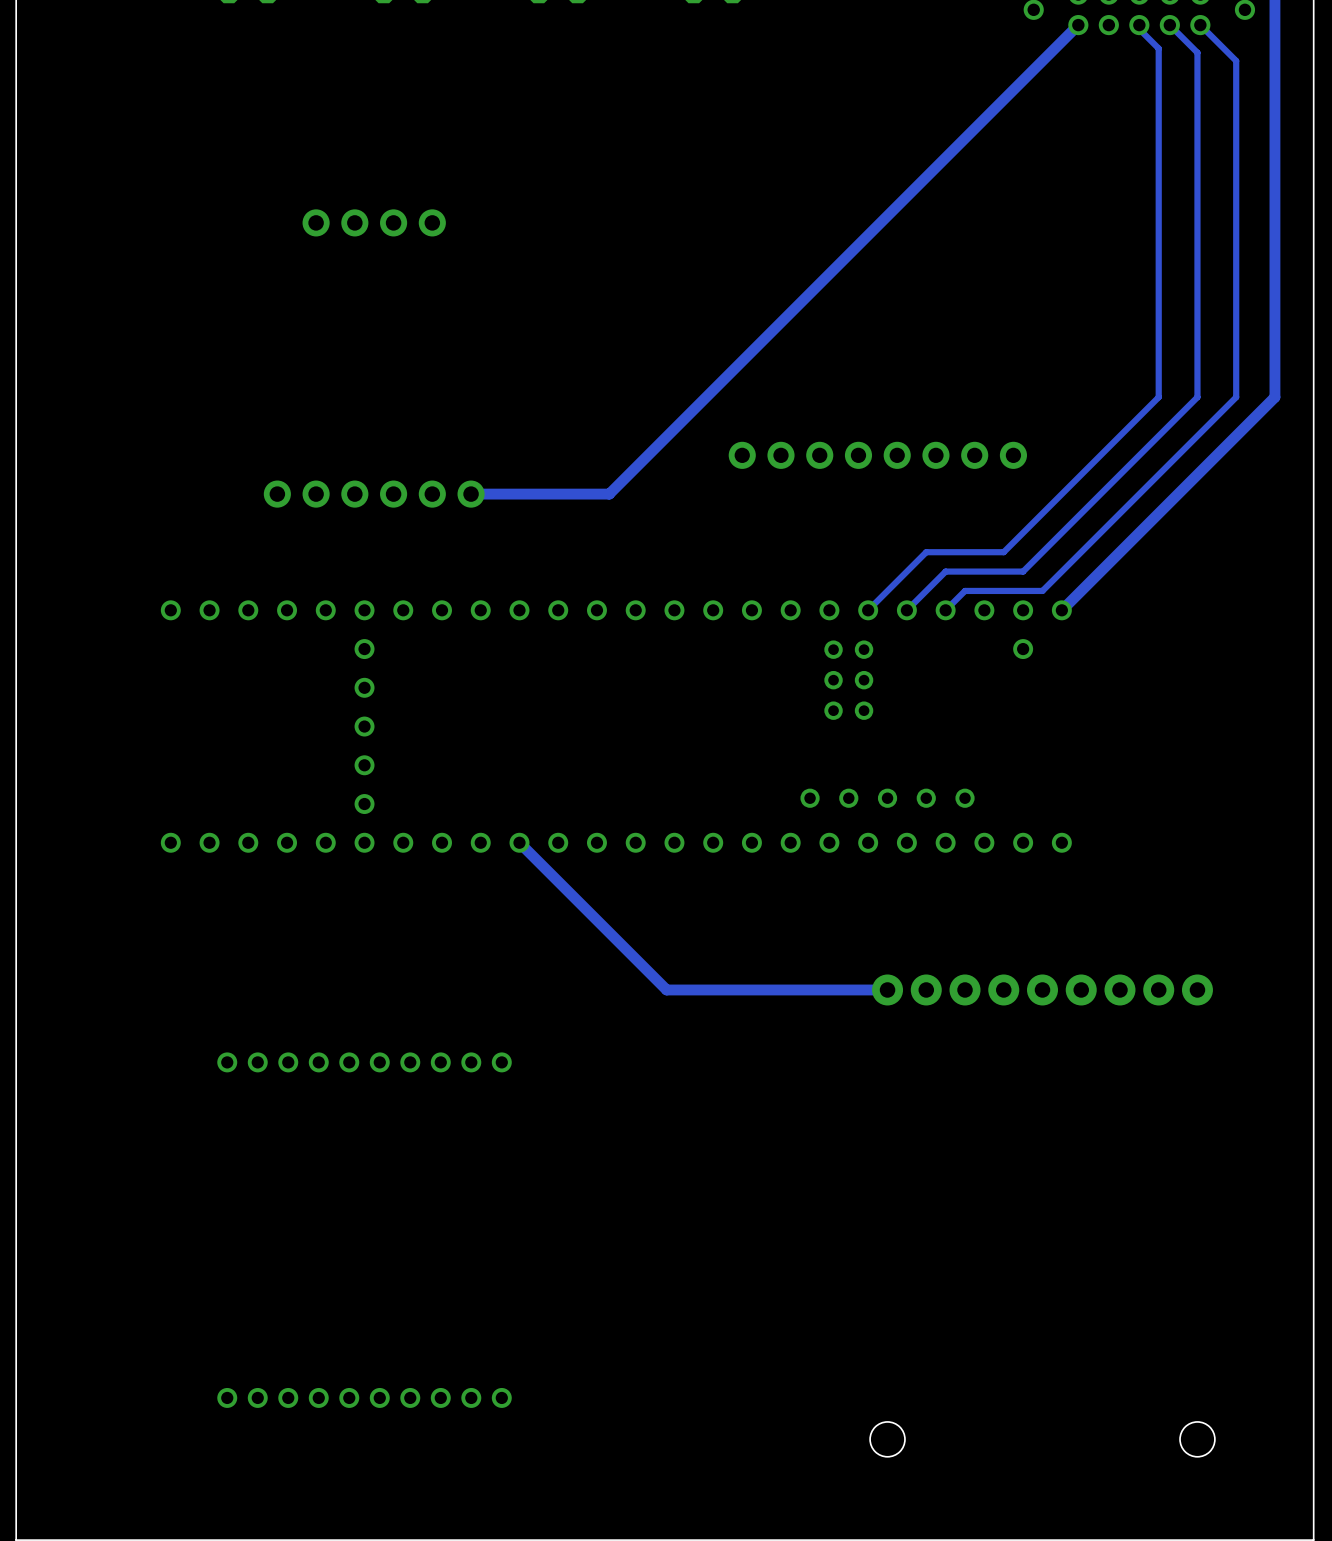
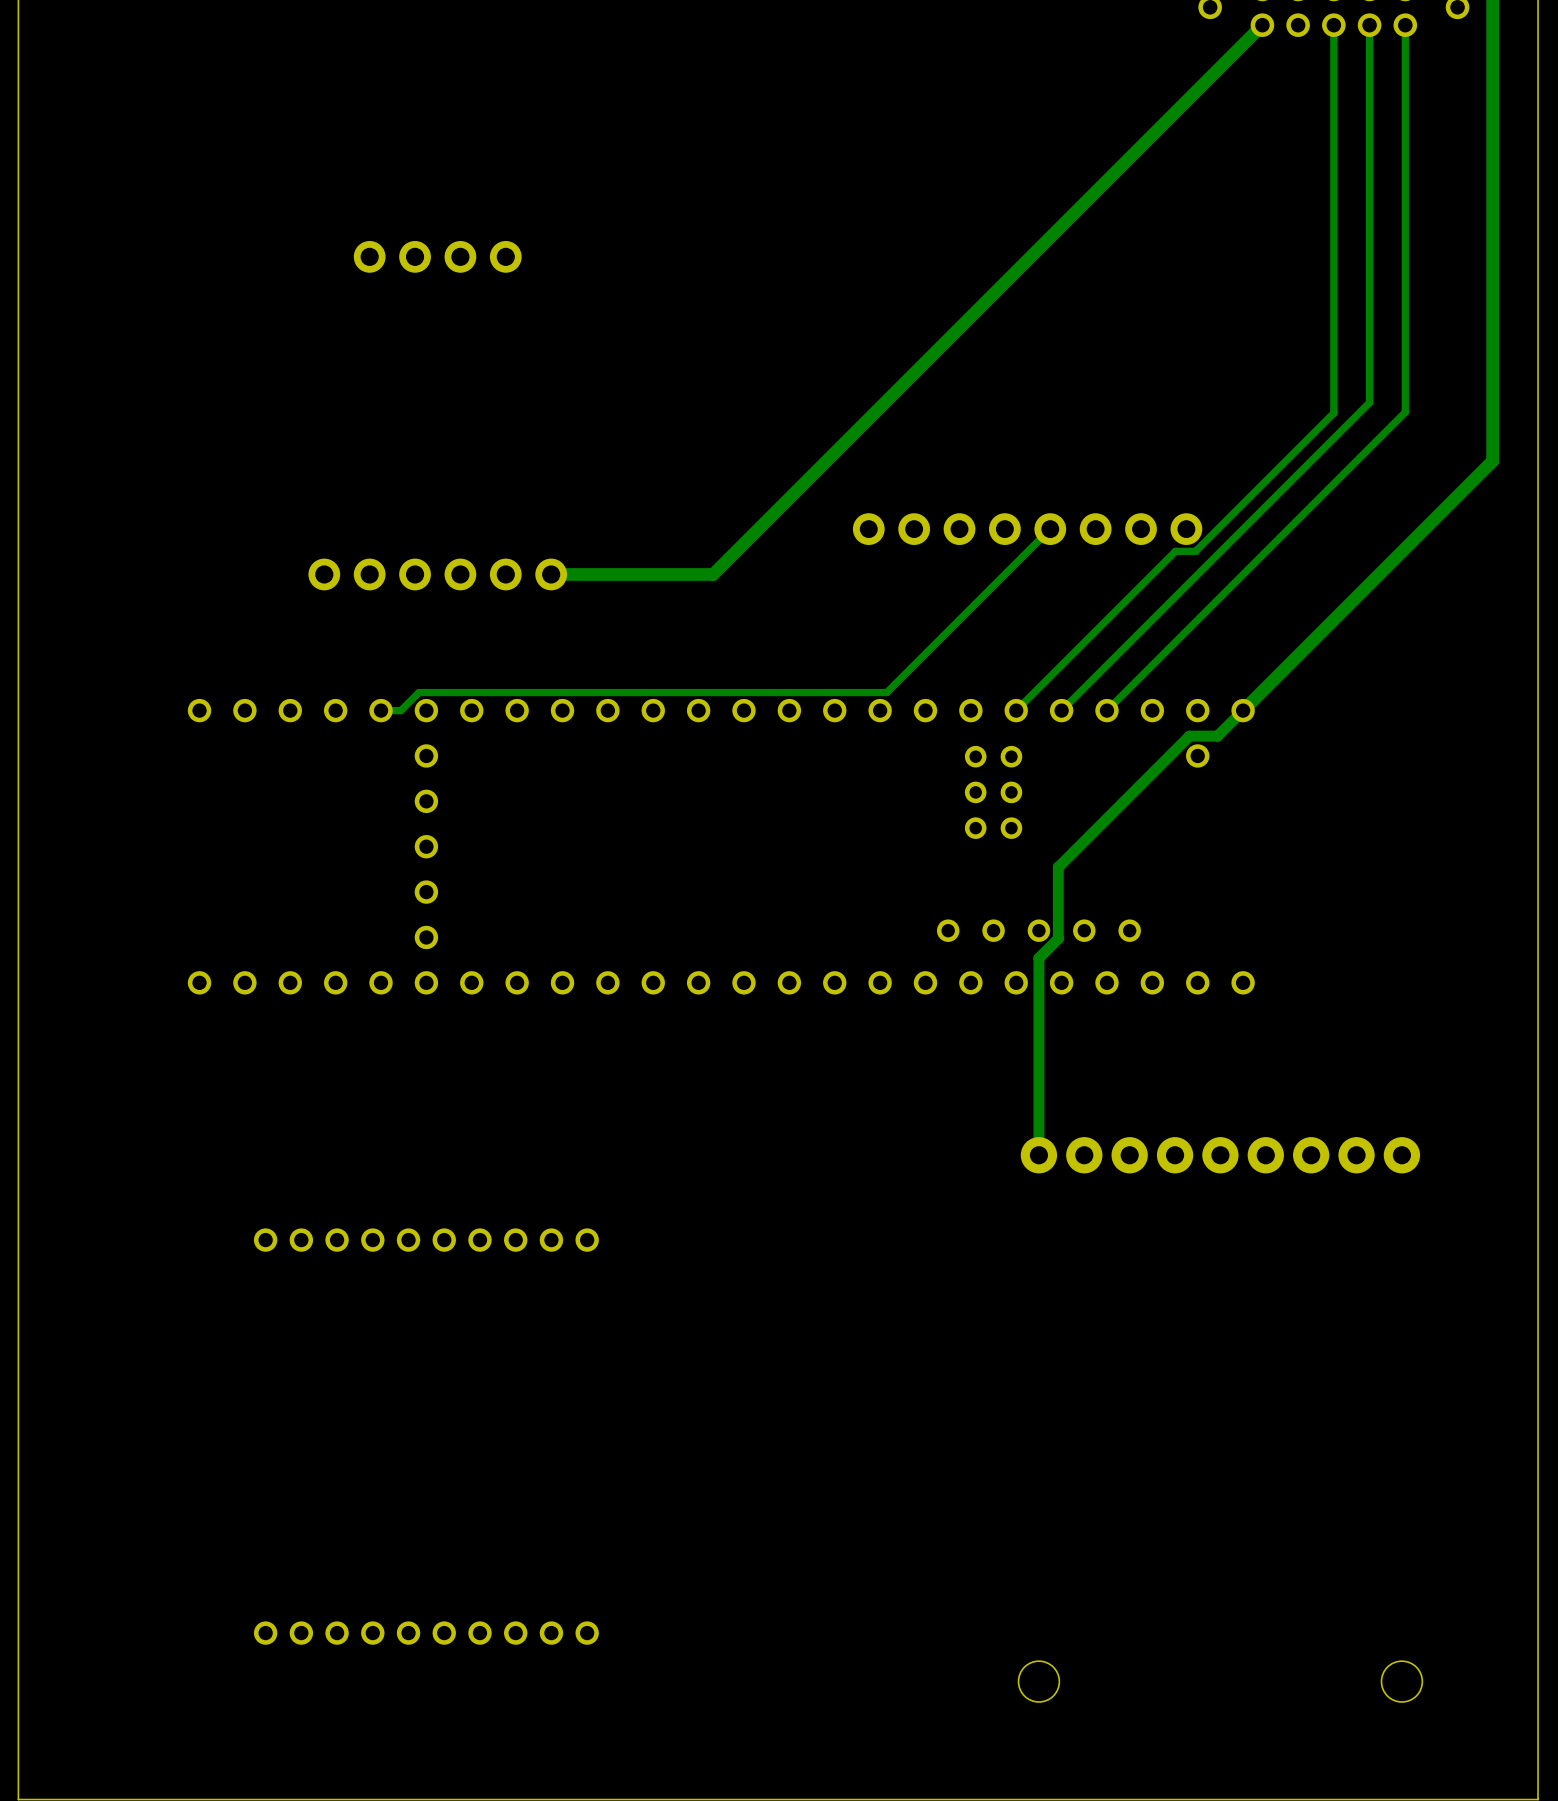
track: (1169, 25) (1197, 52) (1197, 397) (1023, 571) (945, 571) -> (1369, 25) (1369, 402) (1106, 665)
track: (1200, 25) (1236, 60) (1236, 397) (1042, 590) (965, 590) -> none
track: (1139, 29) (1158, 48) (1158, 397) -> (1405, 25) (1405, 412) (1356, 461)
track: none -> (1333, 30) (1333, 413) (1195, 551) (1175, 551) (1084, 642)
track: none -> (1050, 529) (886, 692) (418, 692) (400, 710) (381, 710)
track: (1003, 552) (926, 552) -> (1175, 642) (1129, 687)
track: (519, 842) (666, 989) (887, 989) -> (1243, 710) (1217, 736) (1189, 736) (1058, 867) (1058, 938) (1038, 958) (1038, 1155)

